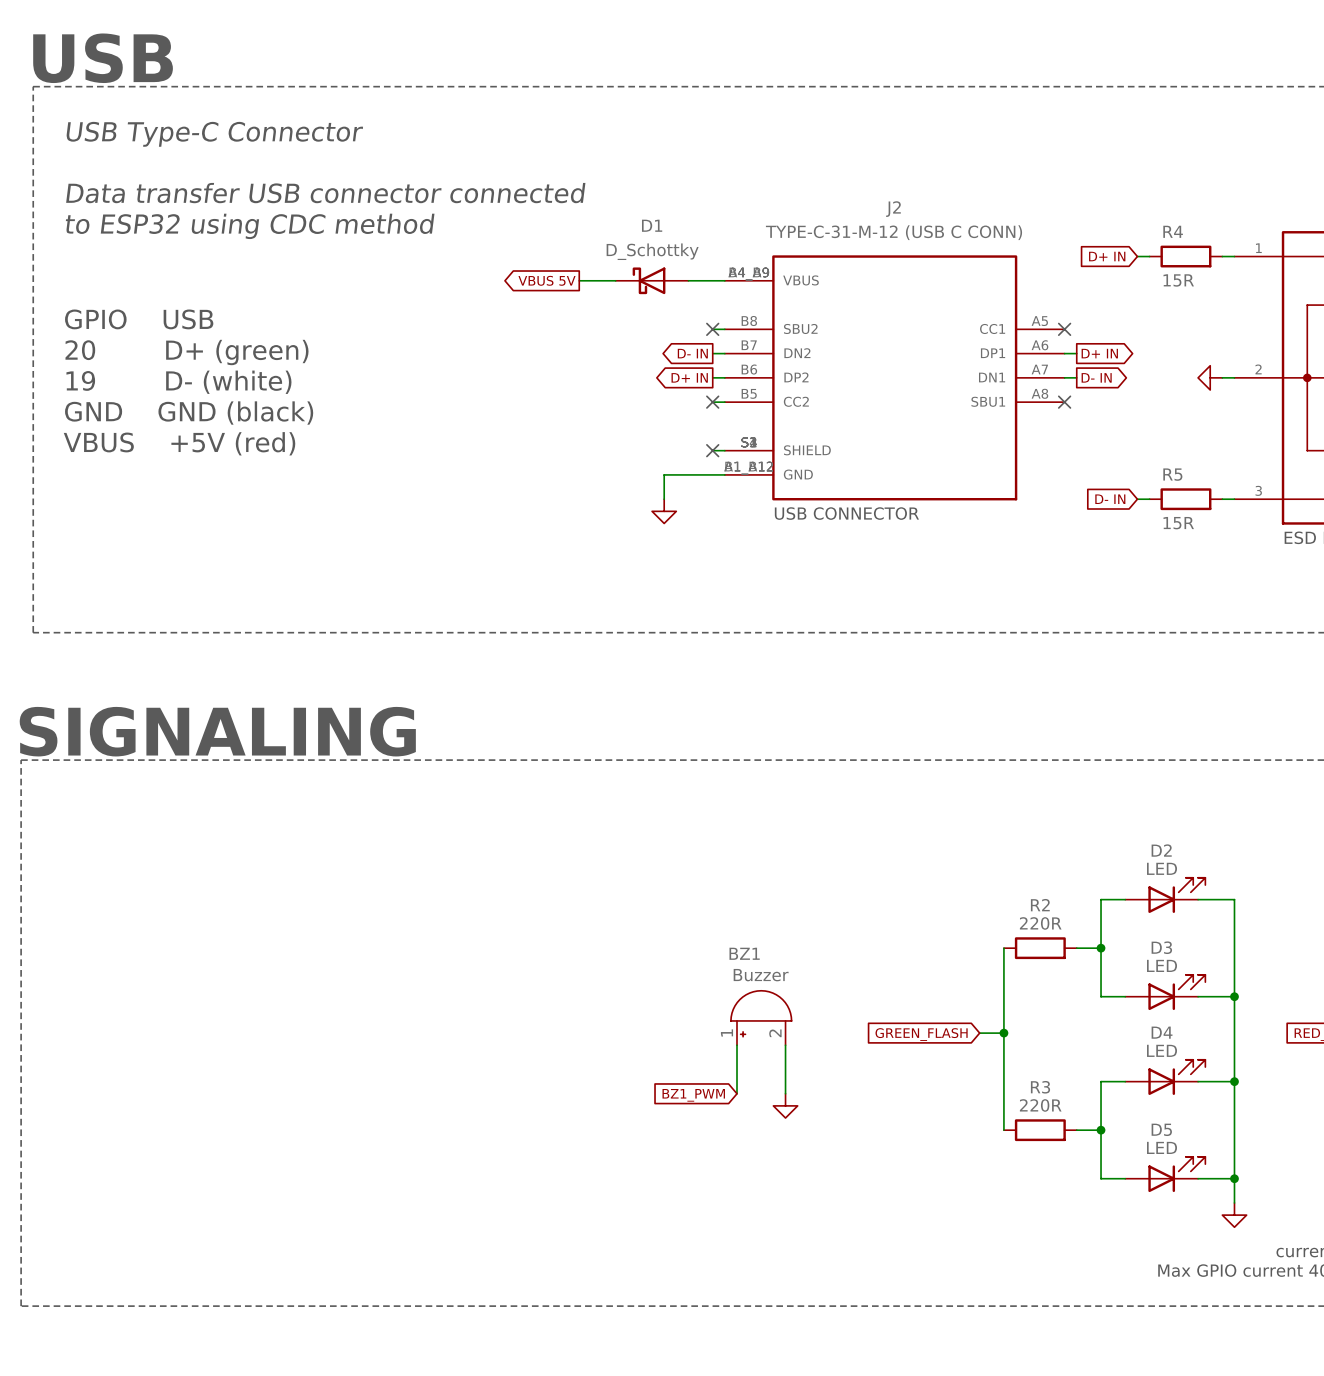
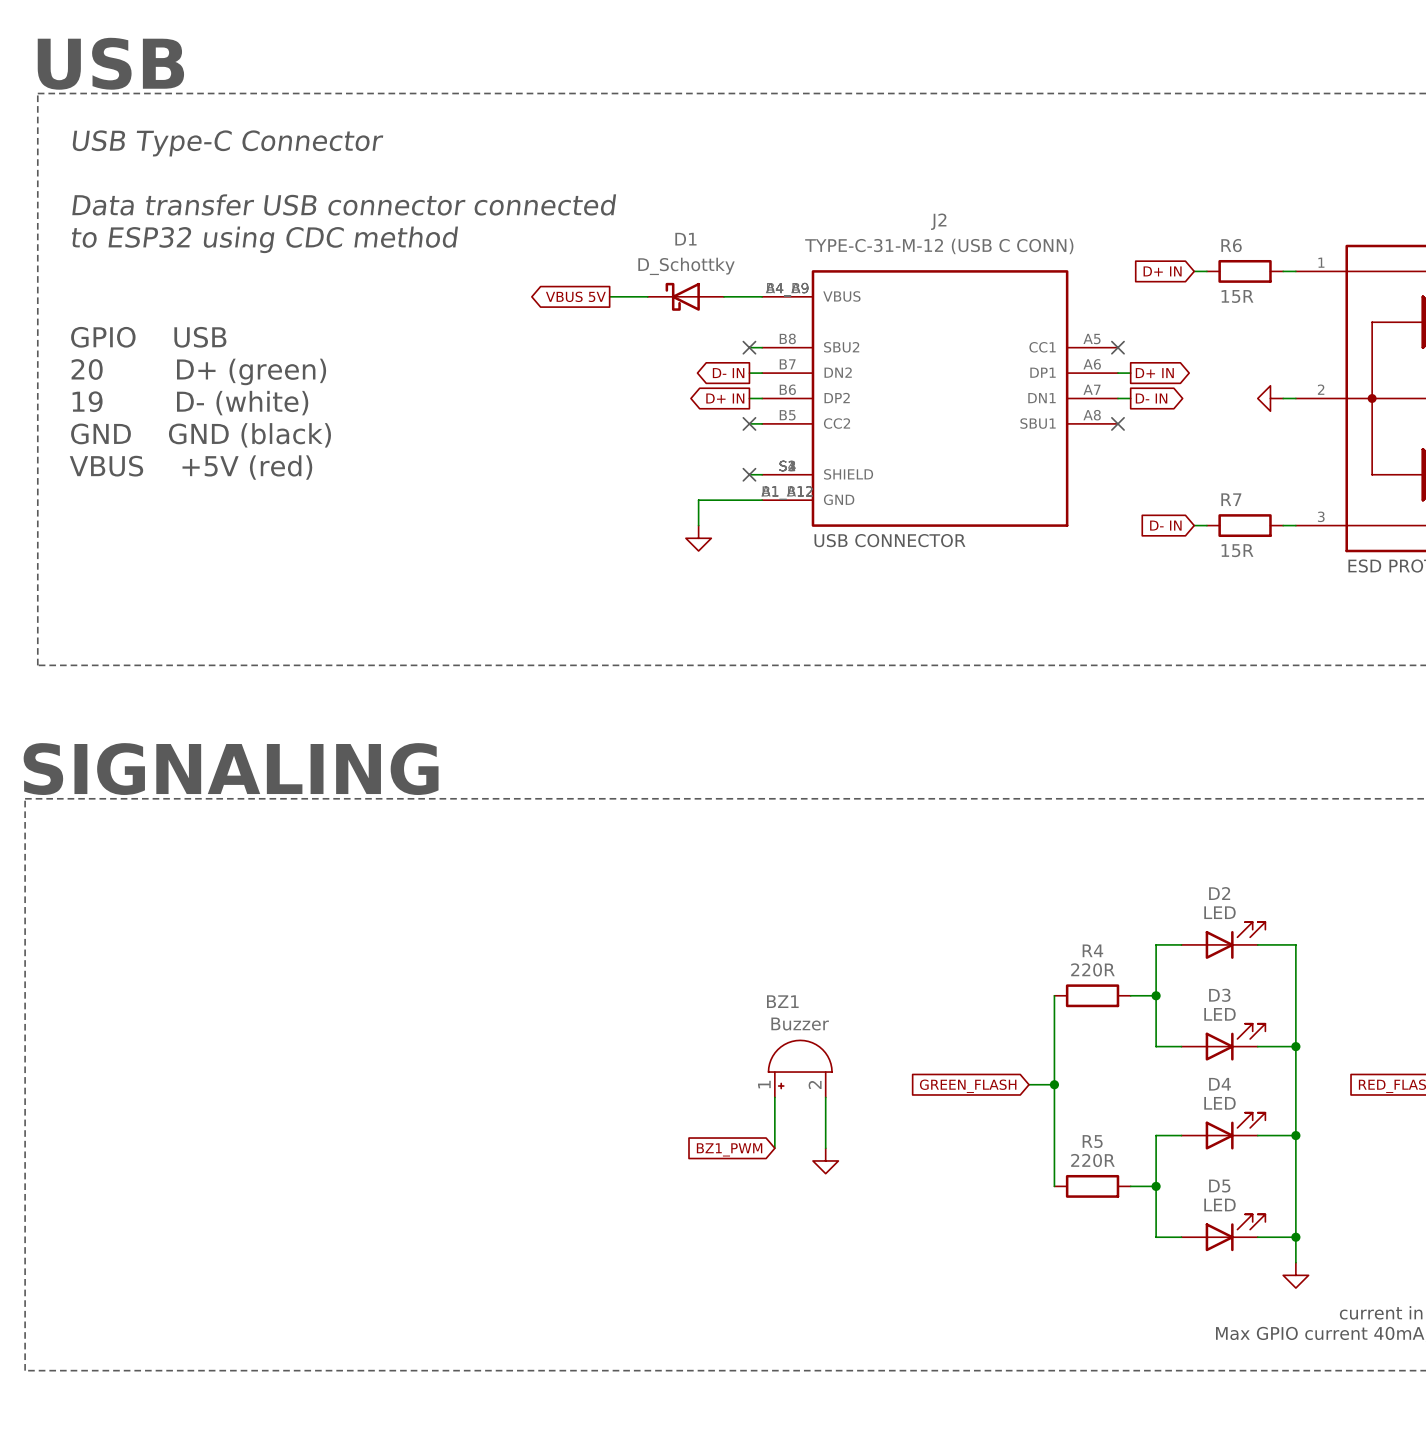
R4 name: R4 (1173, 231) -> R6 (1231, 245)
R5 name: R5 (1172, 474) -> R7 (1231, 499)
R2 name: R2 (1040, 905) -> R4 (1092, 950)
R3 name: R3 (1040, 1087) -> R5 (1092, 1141)

